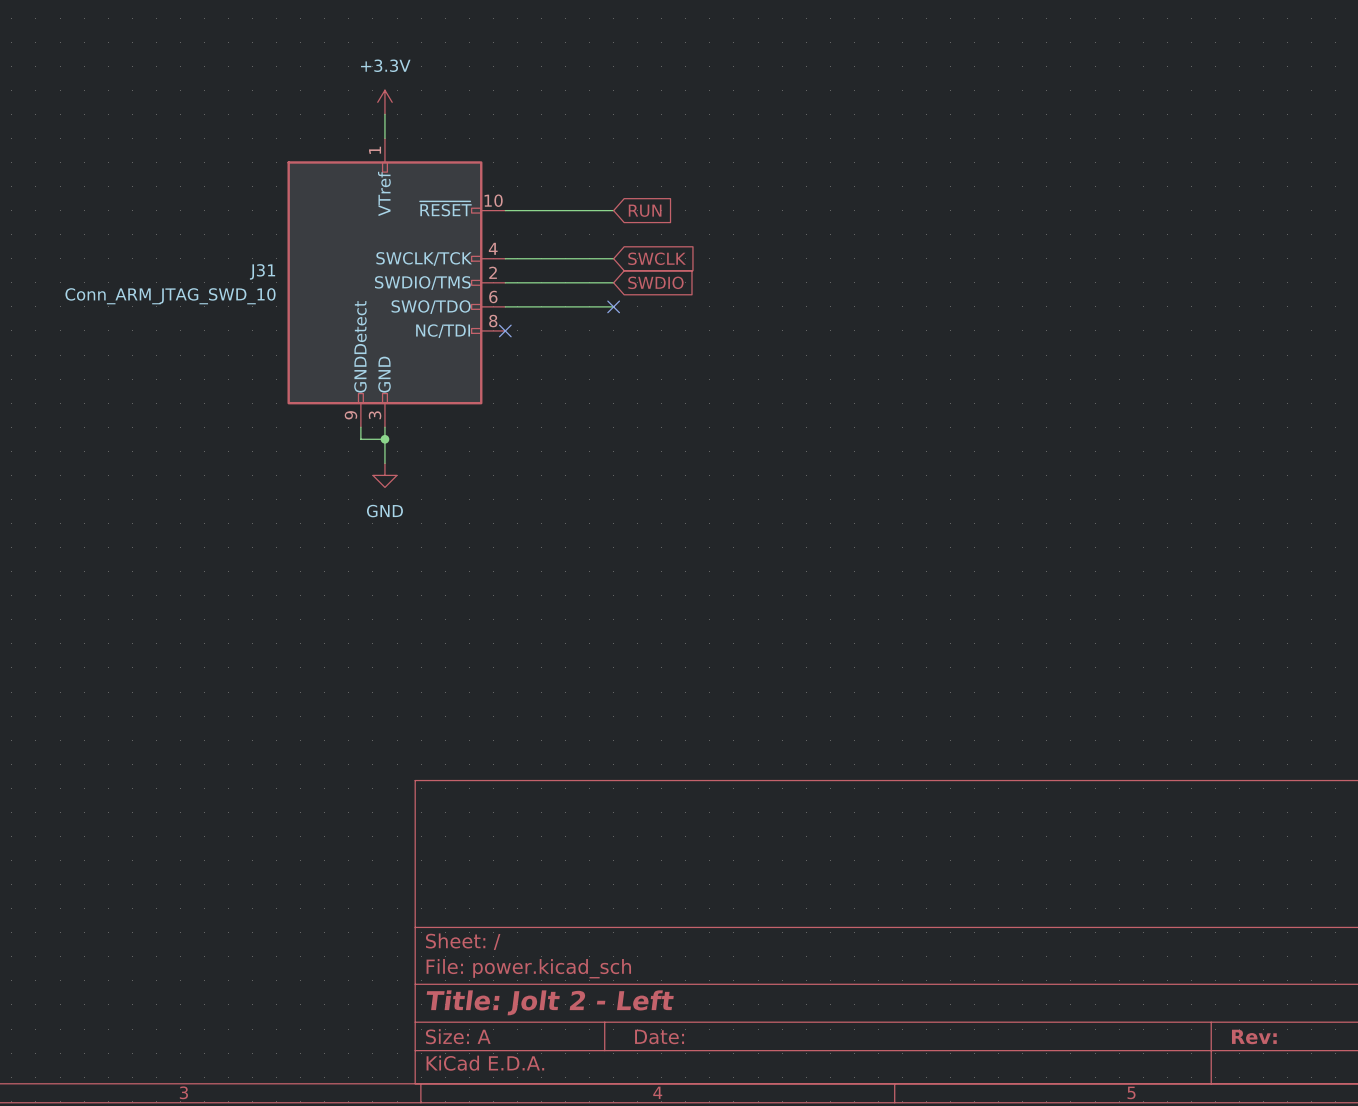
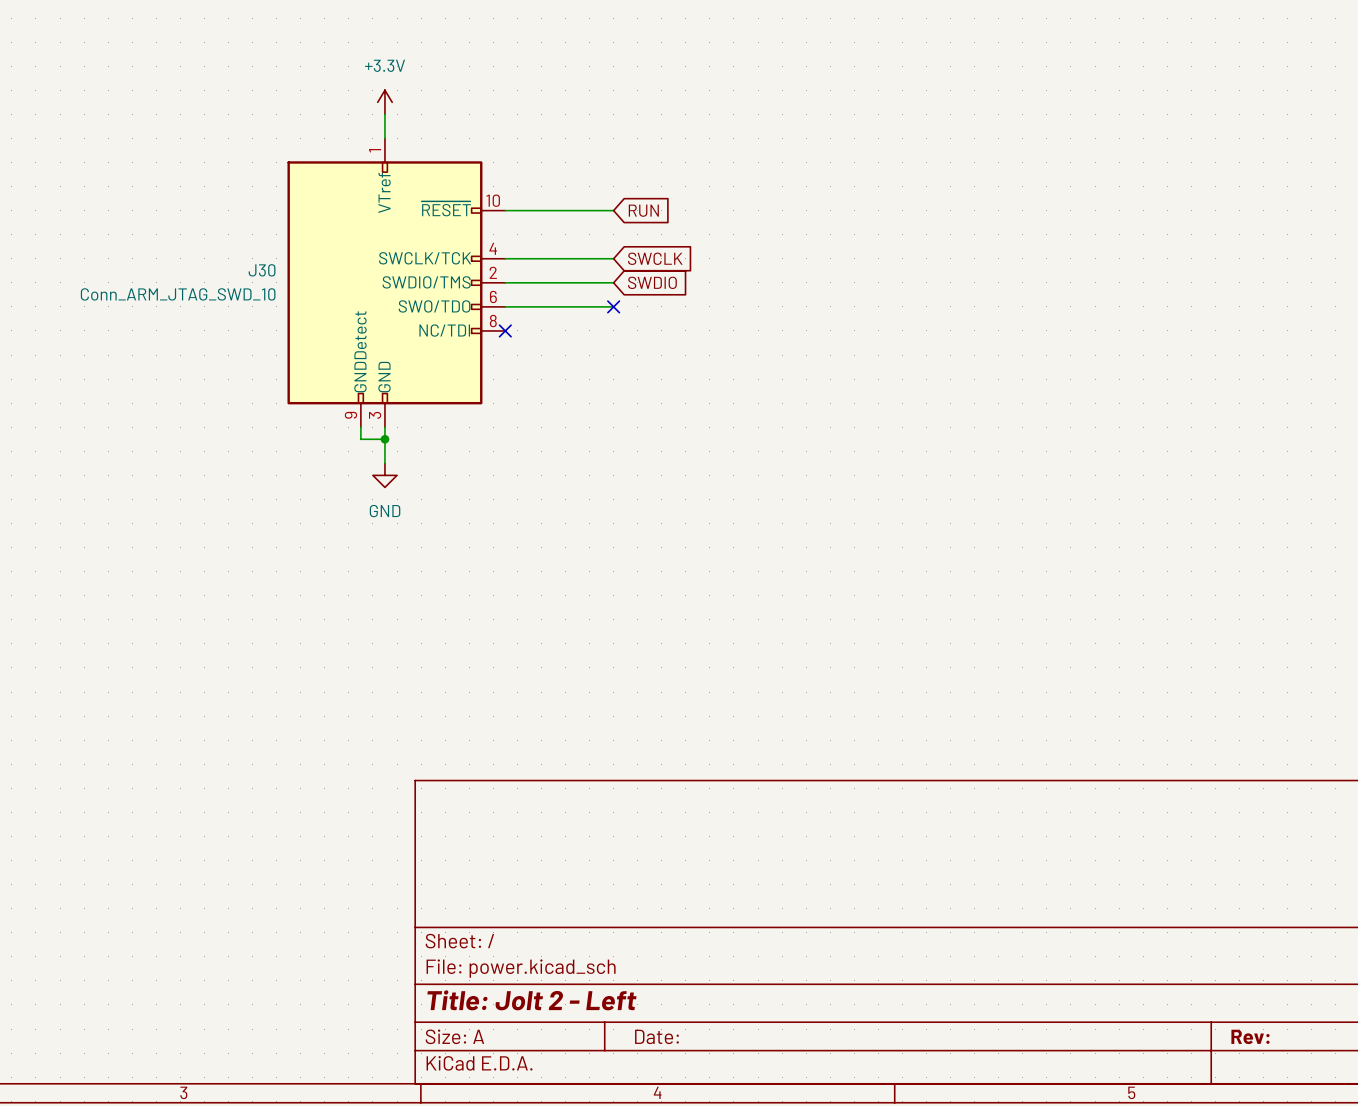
J31 name: J31 (262, 271) -> J30 (262, 270)

